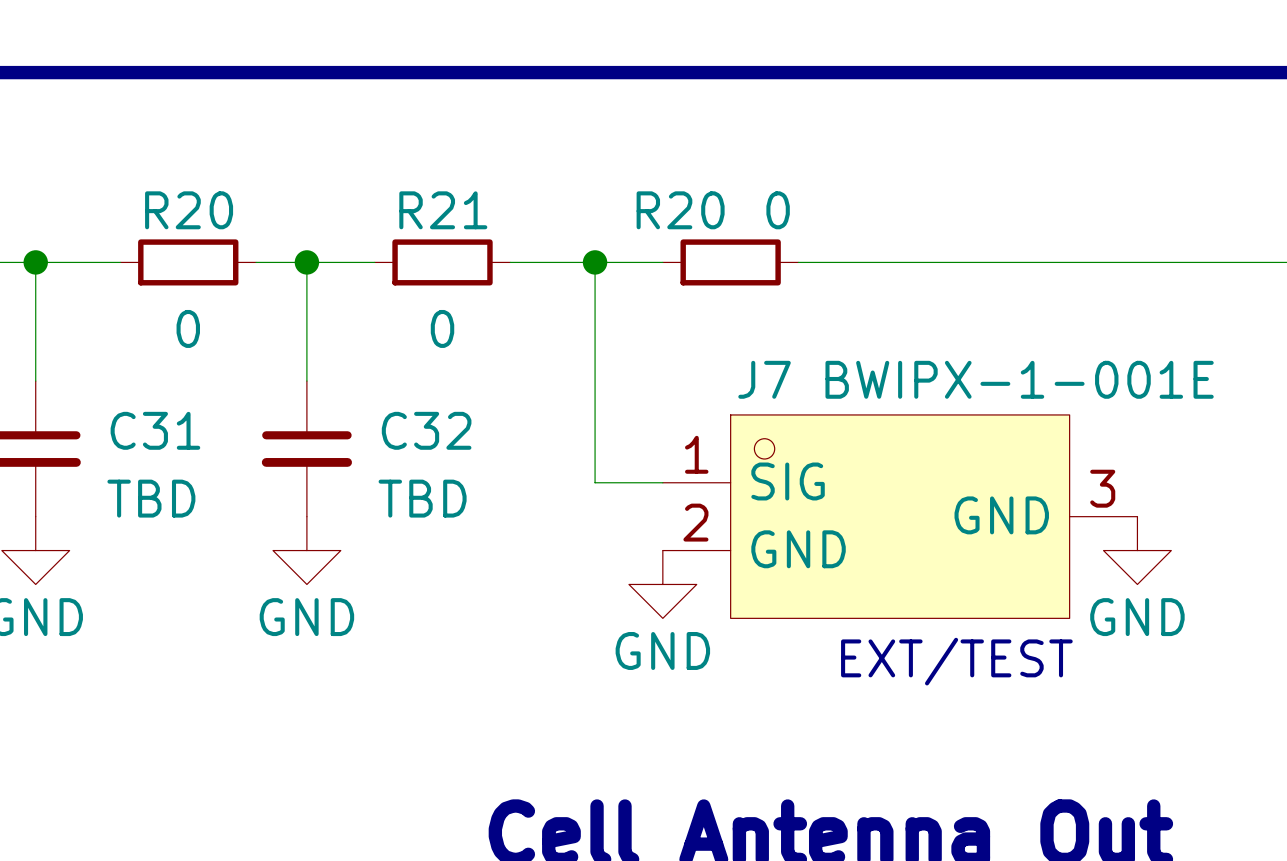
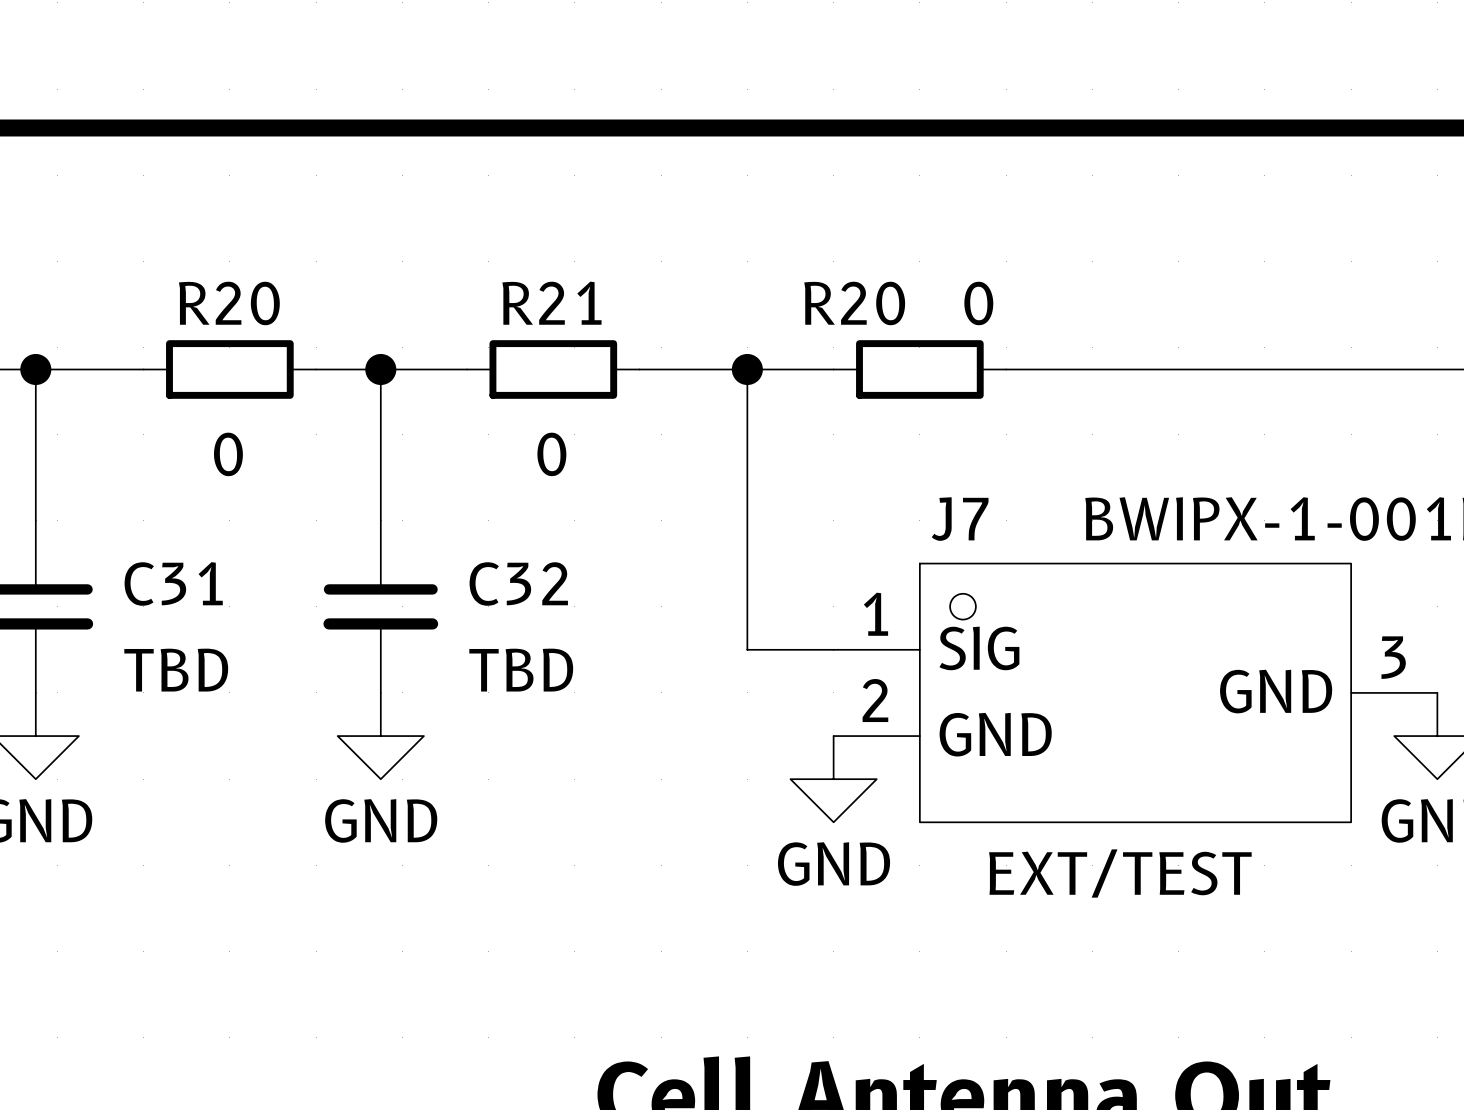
text position: EXT/TEST (956, 661) -> EXT/TEST (1120, 873)

